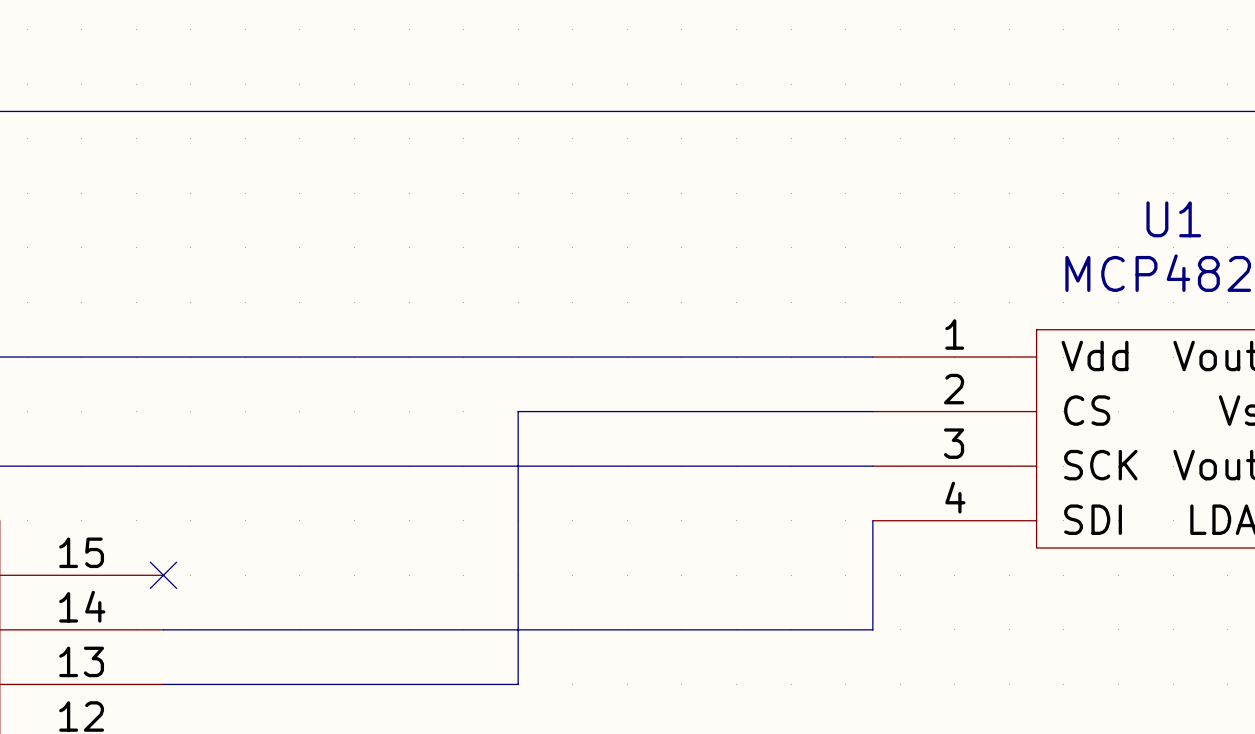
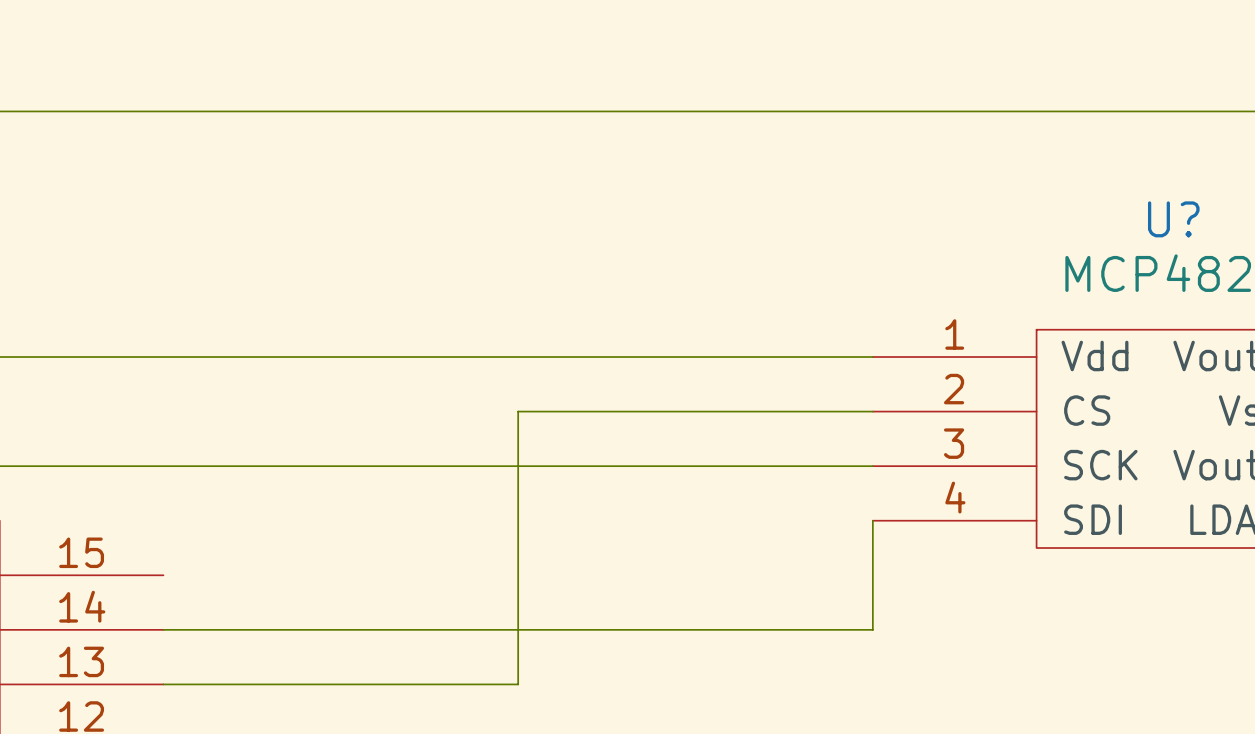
U1 name: U1 (1173, 219) -> U? (1173, 219)
no-connect mark: (163, 575) -> none

